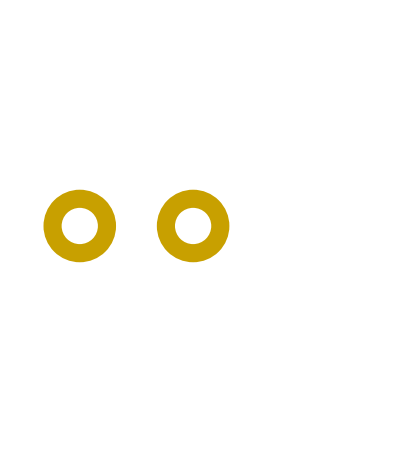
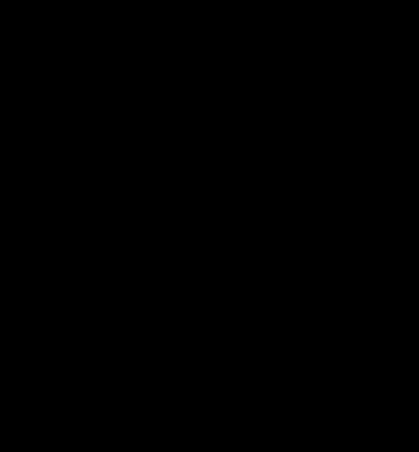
part: (136, 225) -> none

